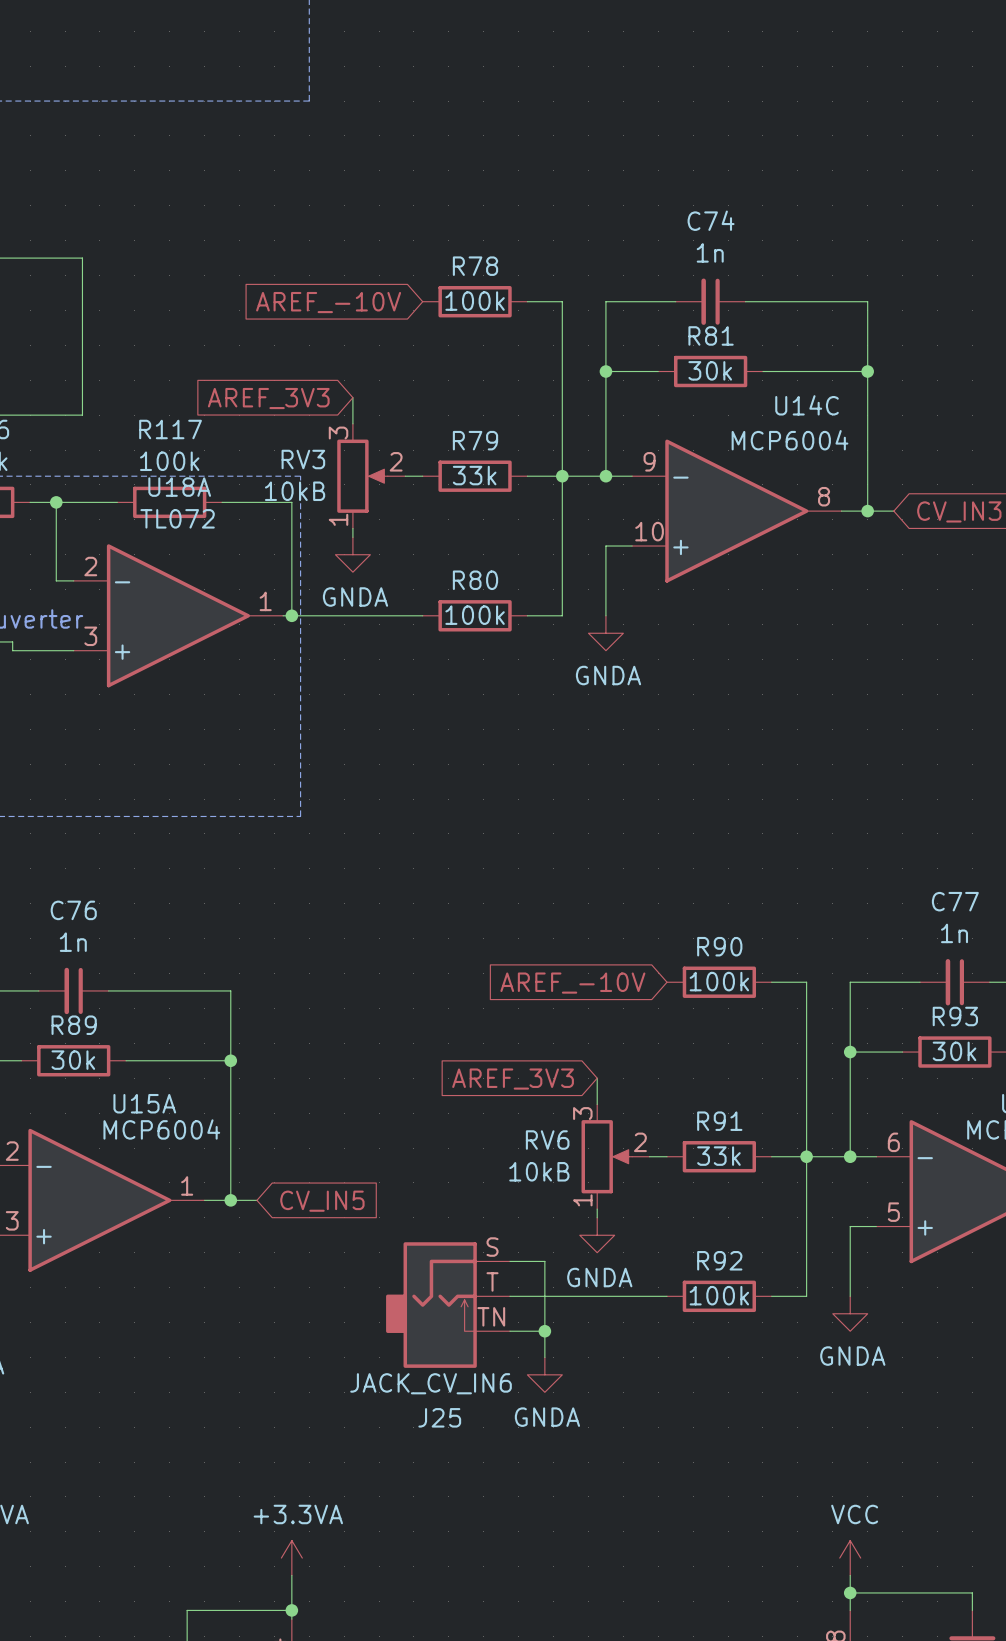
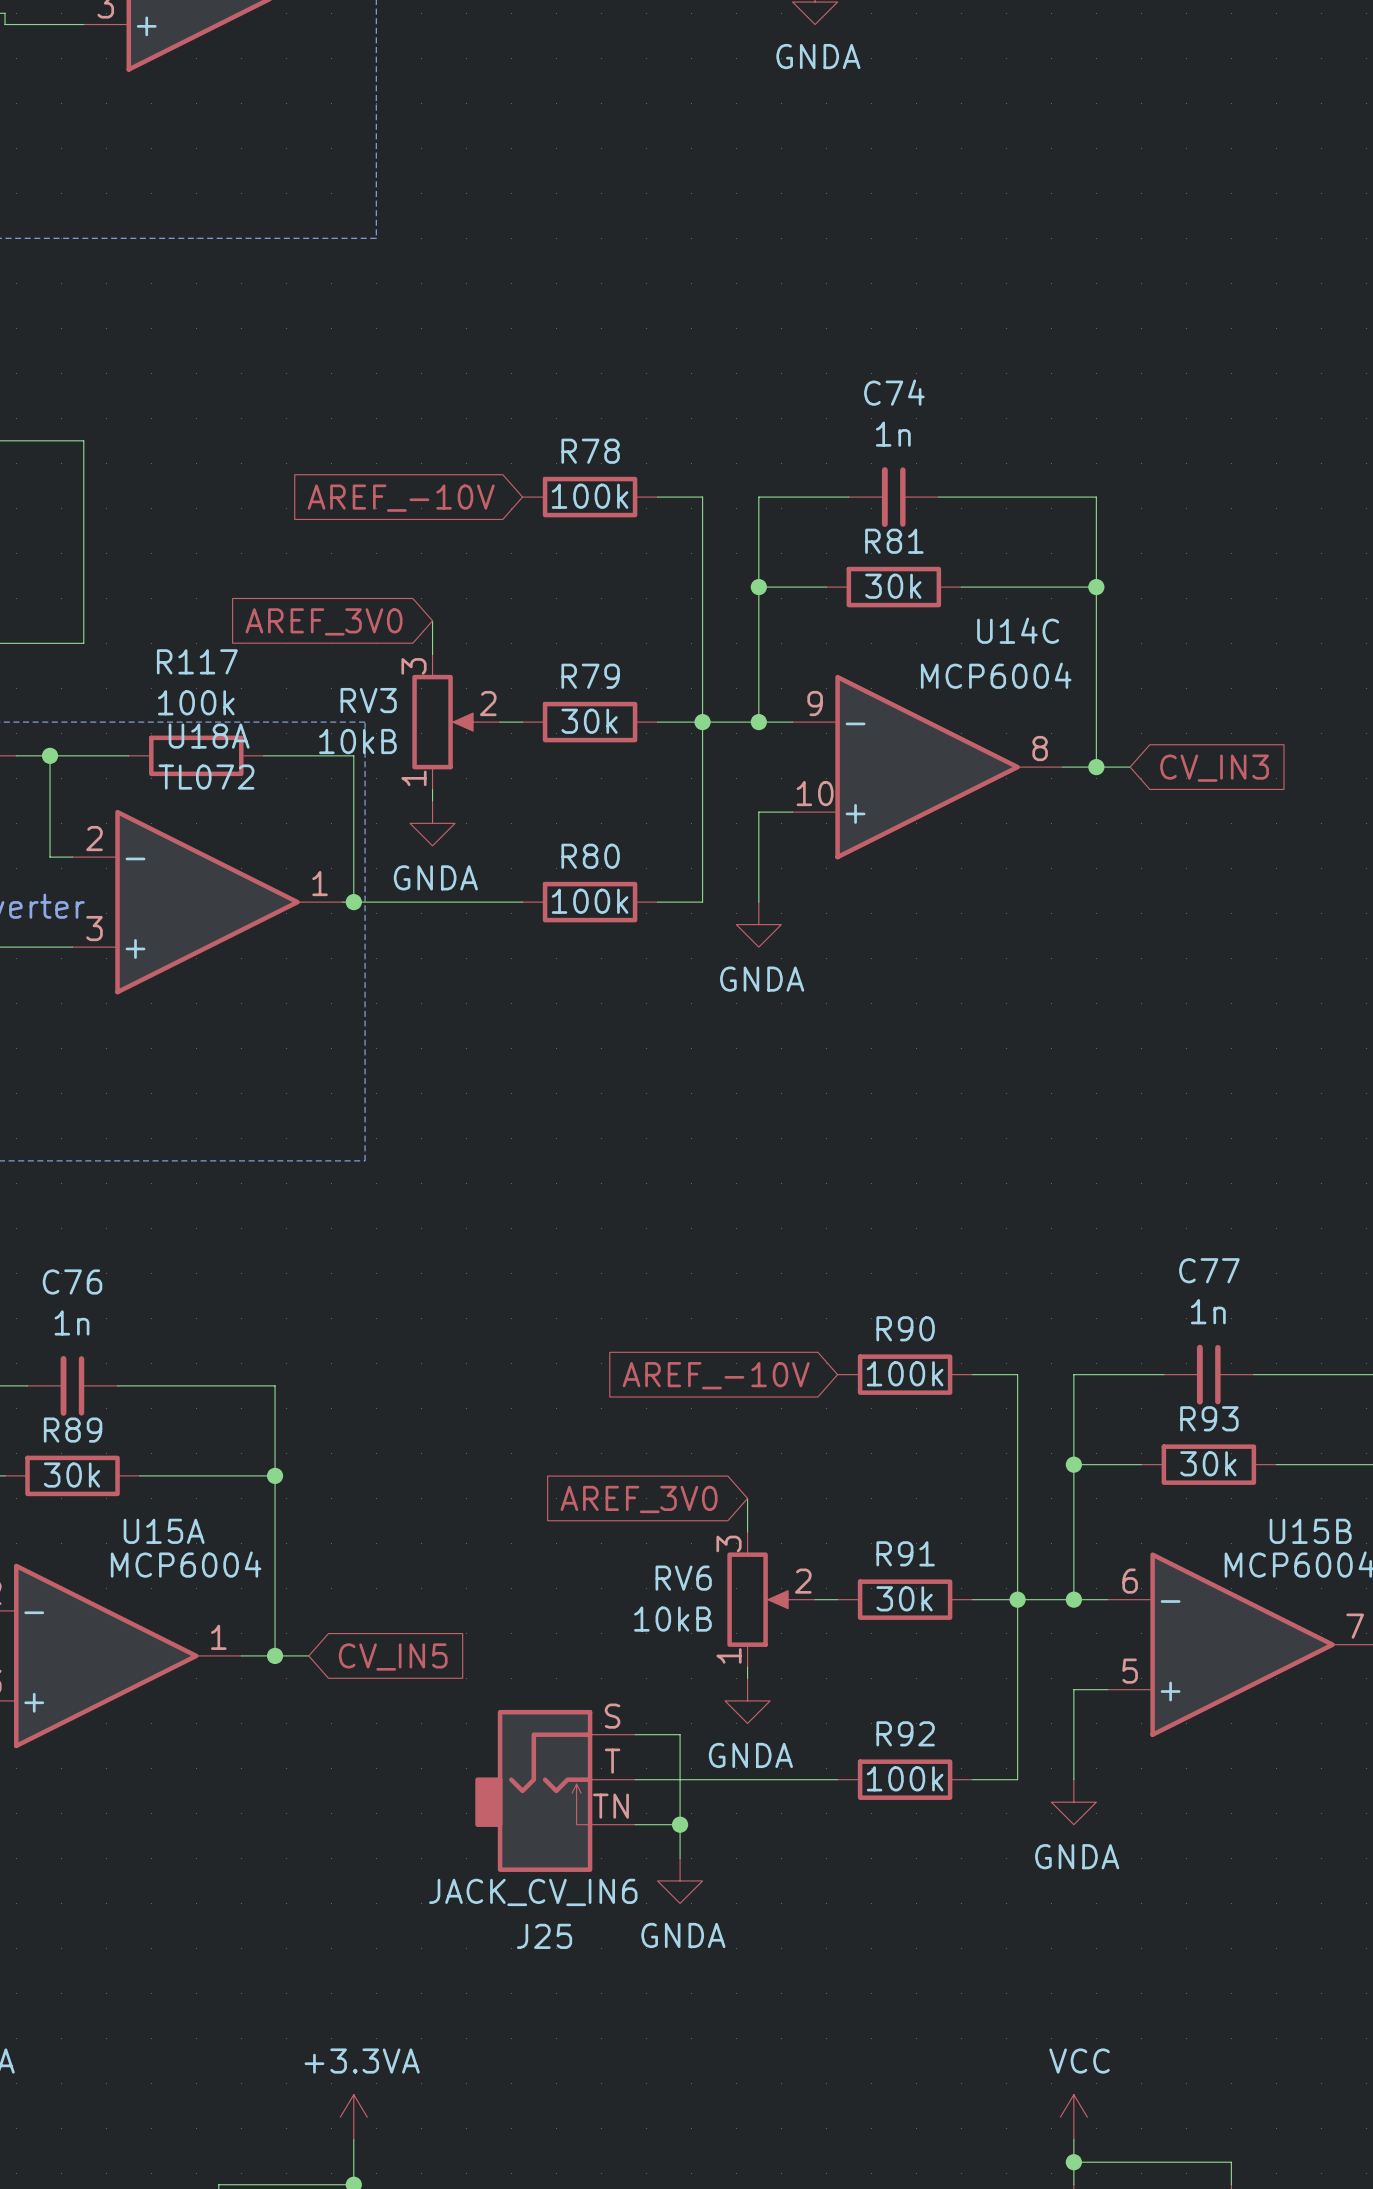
global label: AREF_3V3 (268, 398) -> AREF_3V0 (324, 621)
R79 value: 33k (474, 475) -> 30k (589, 721)
global label: AREF_3V3 (513, 1079) -> AREF_3V0 (639, 1499)
R91 value: 33k (718, 1156) -> 30k (904, 1598)

